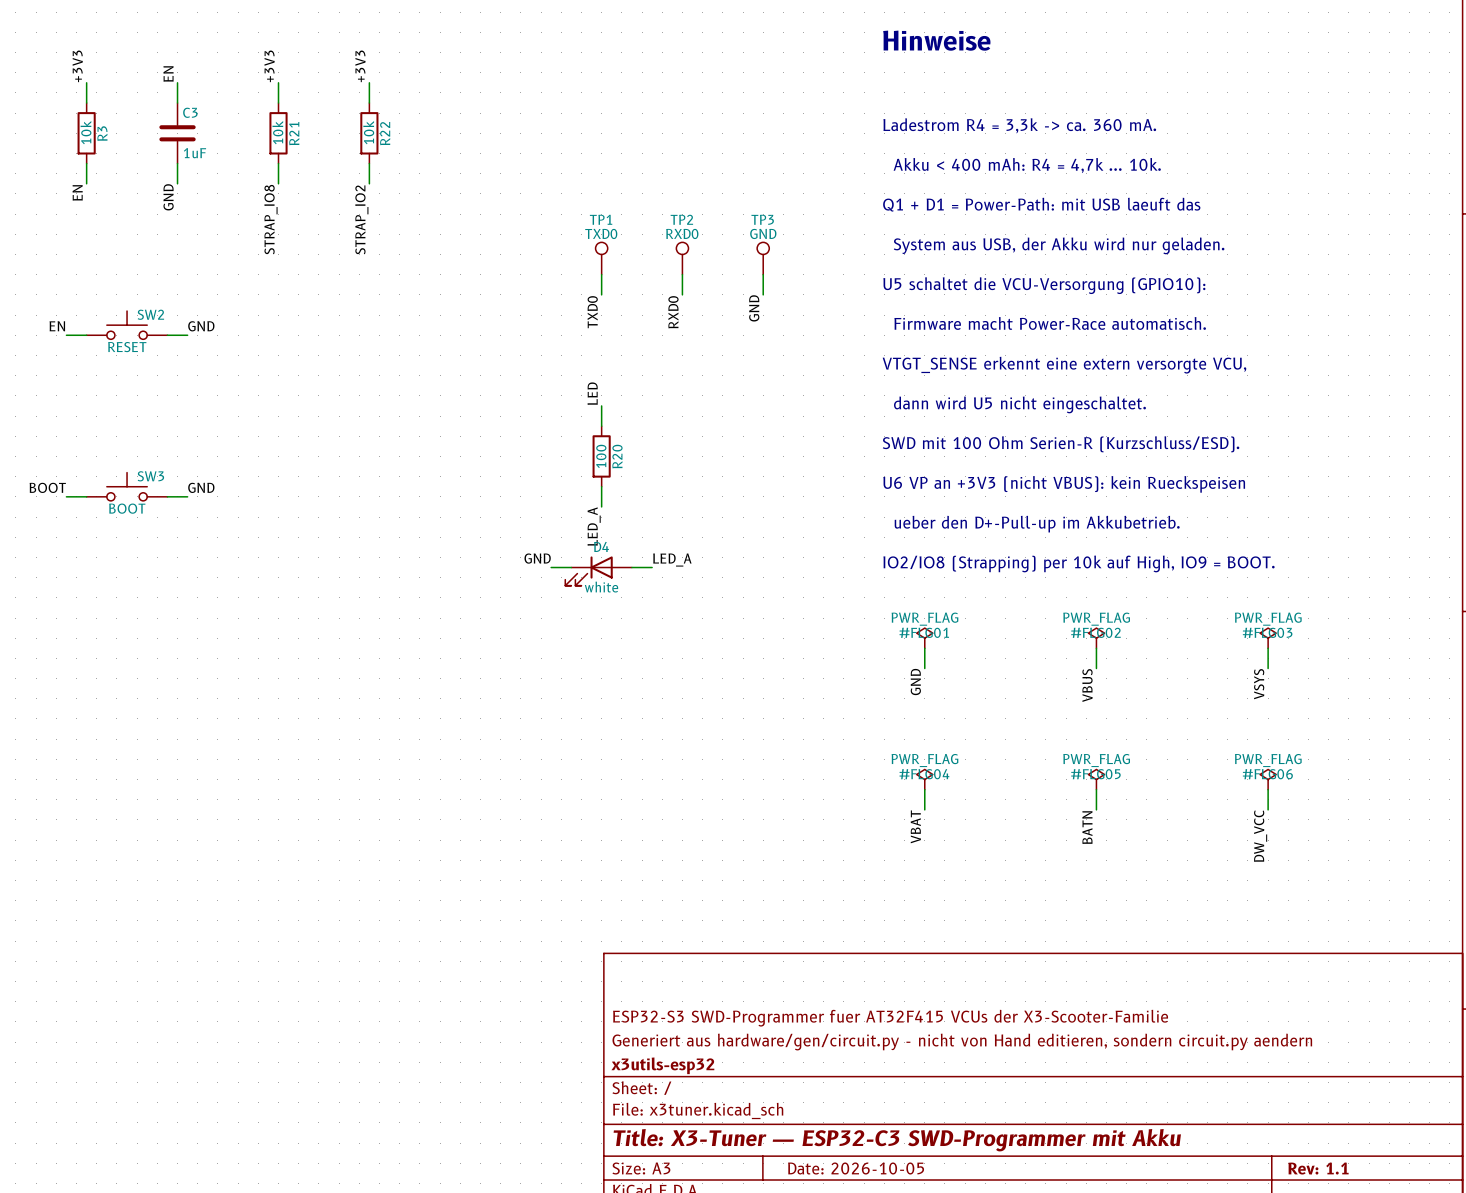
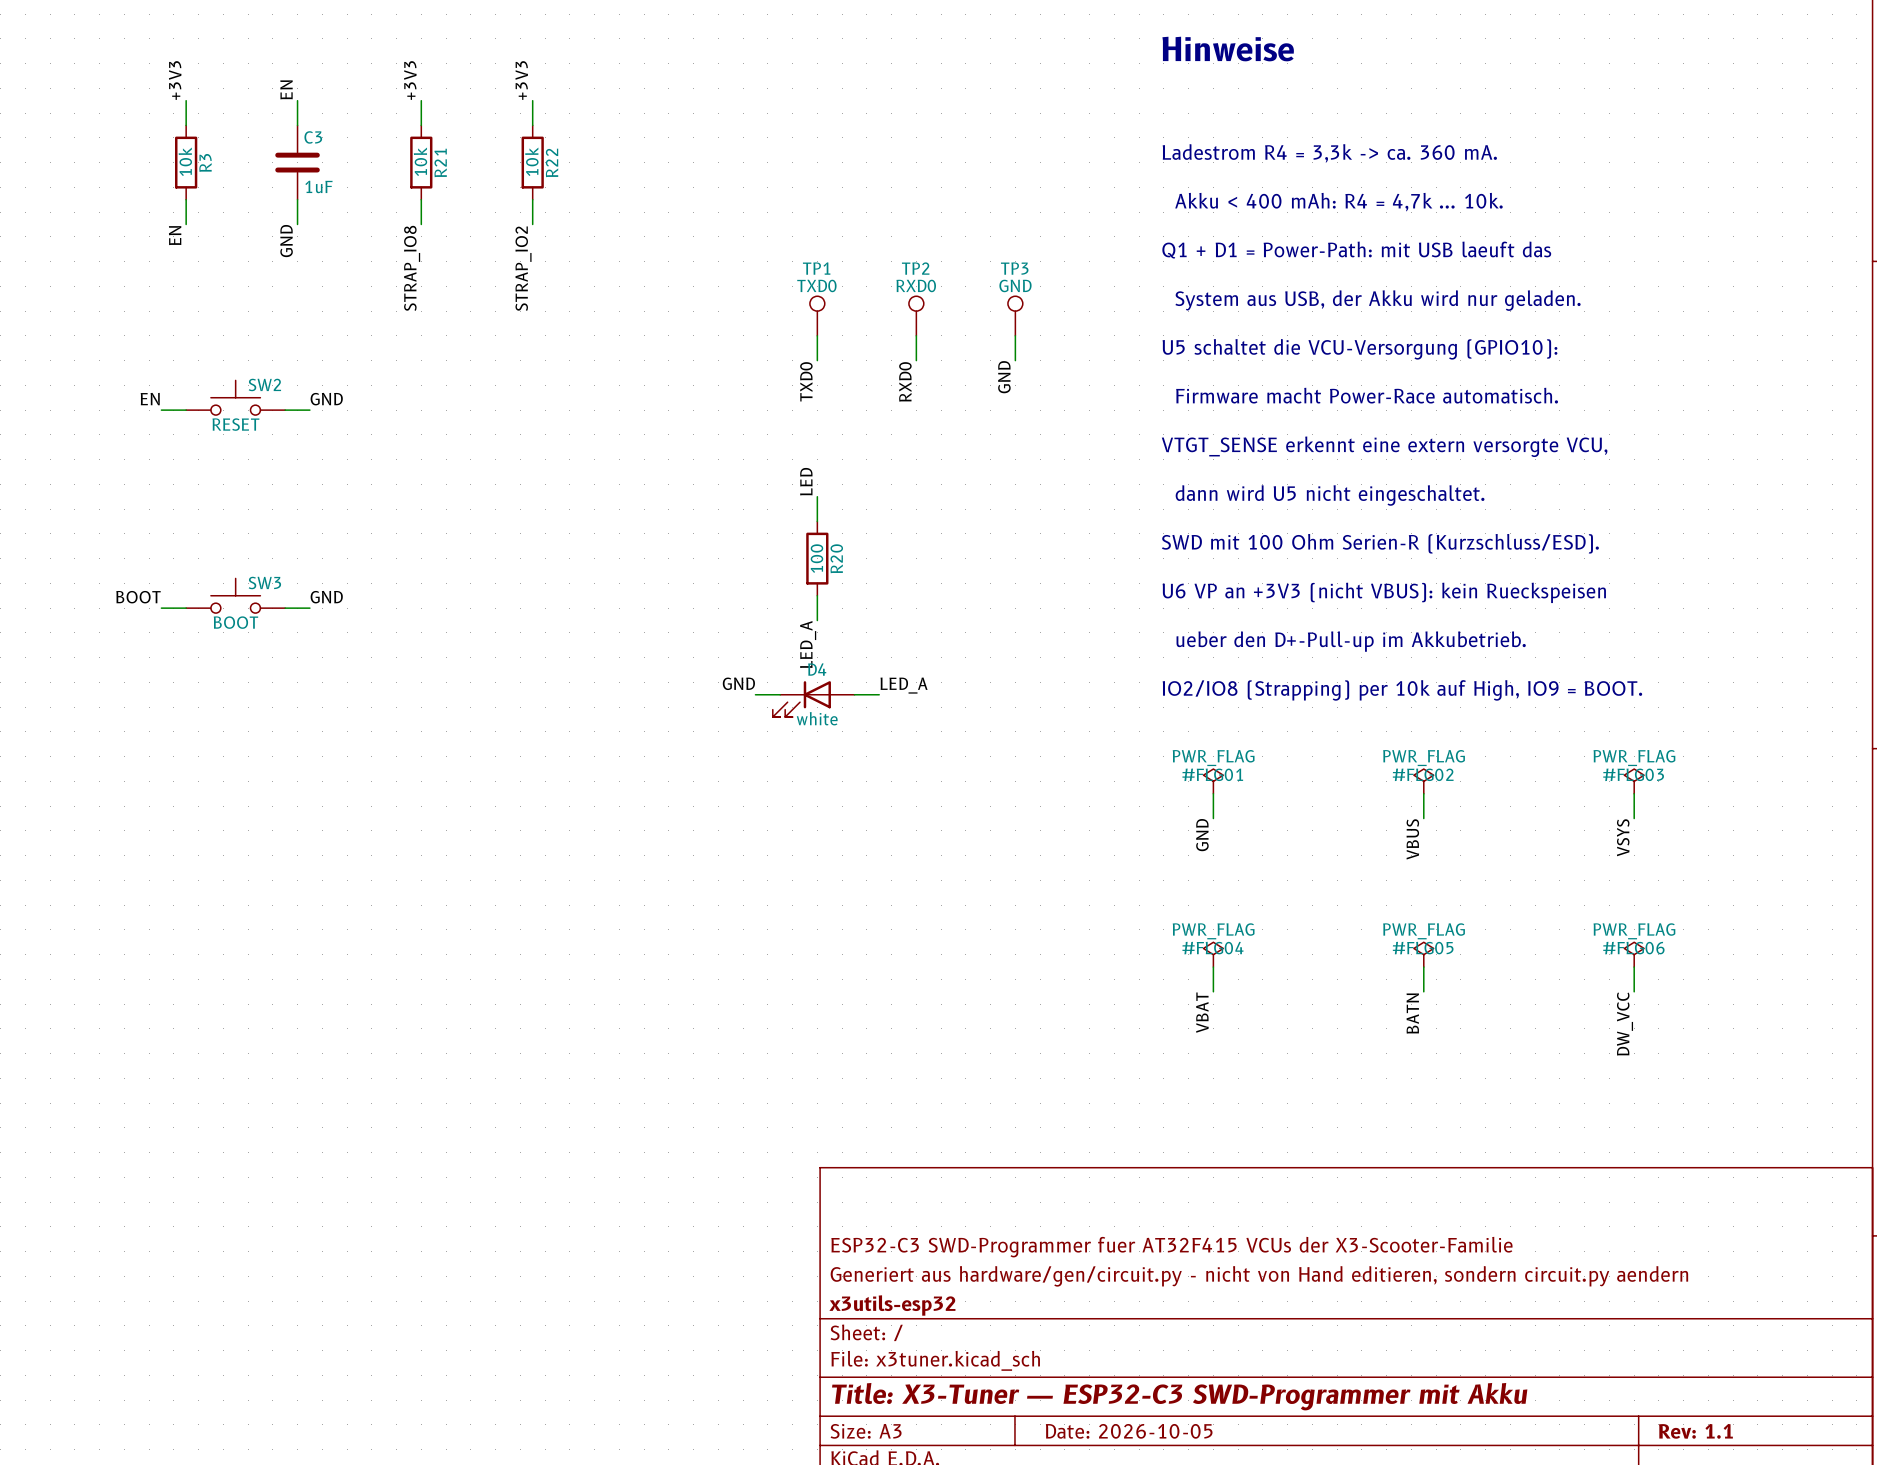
title block: ESP32-S3 SWD-Programmer fuer AT32F415 VCUs der X3-Scooter-Familie (890, 1018) -> ESP32-C3 SWD-Programmer fuer AT32F415 VCUs der X3-Scooter-Familie (1171, 1247)

